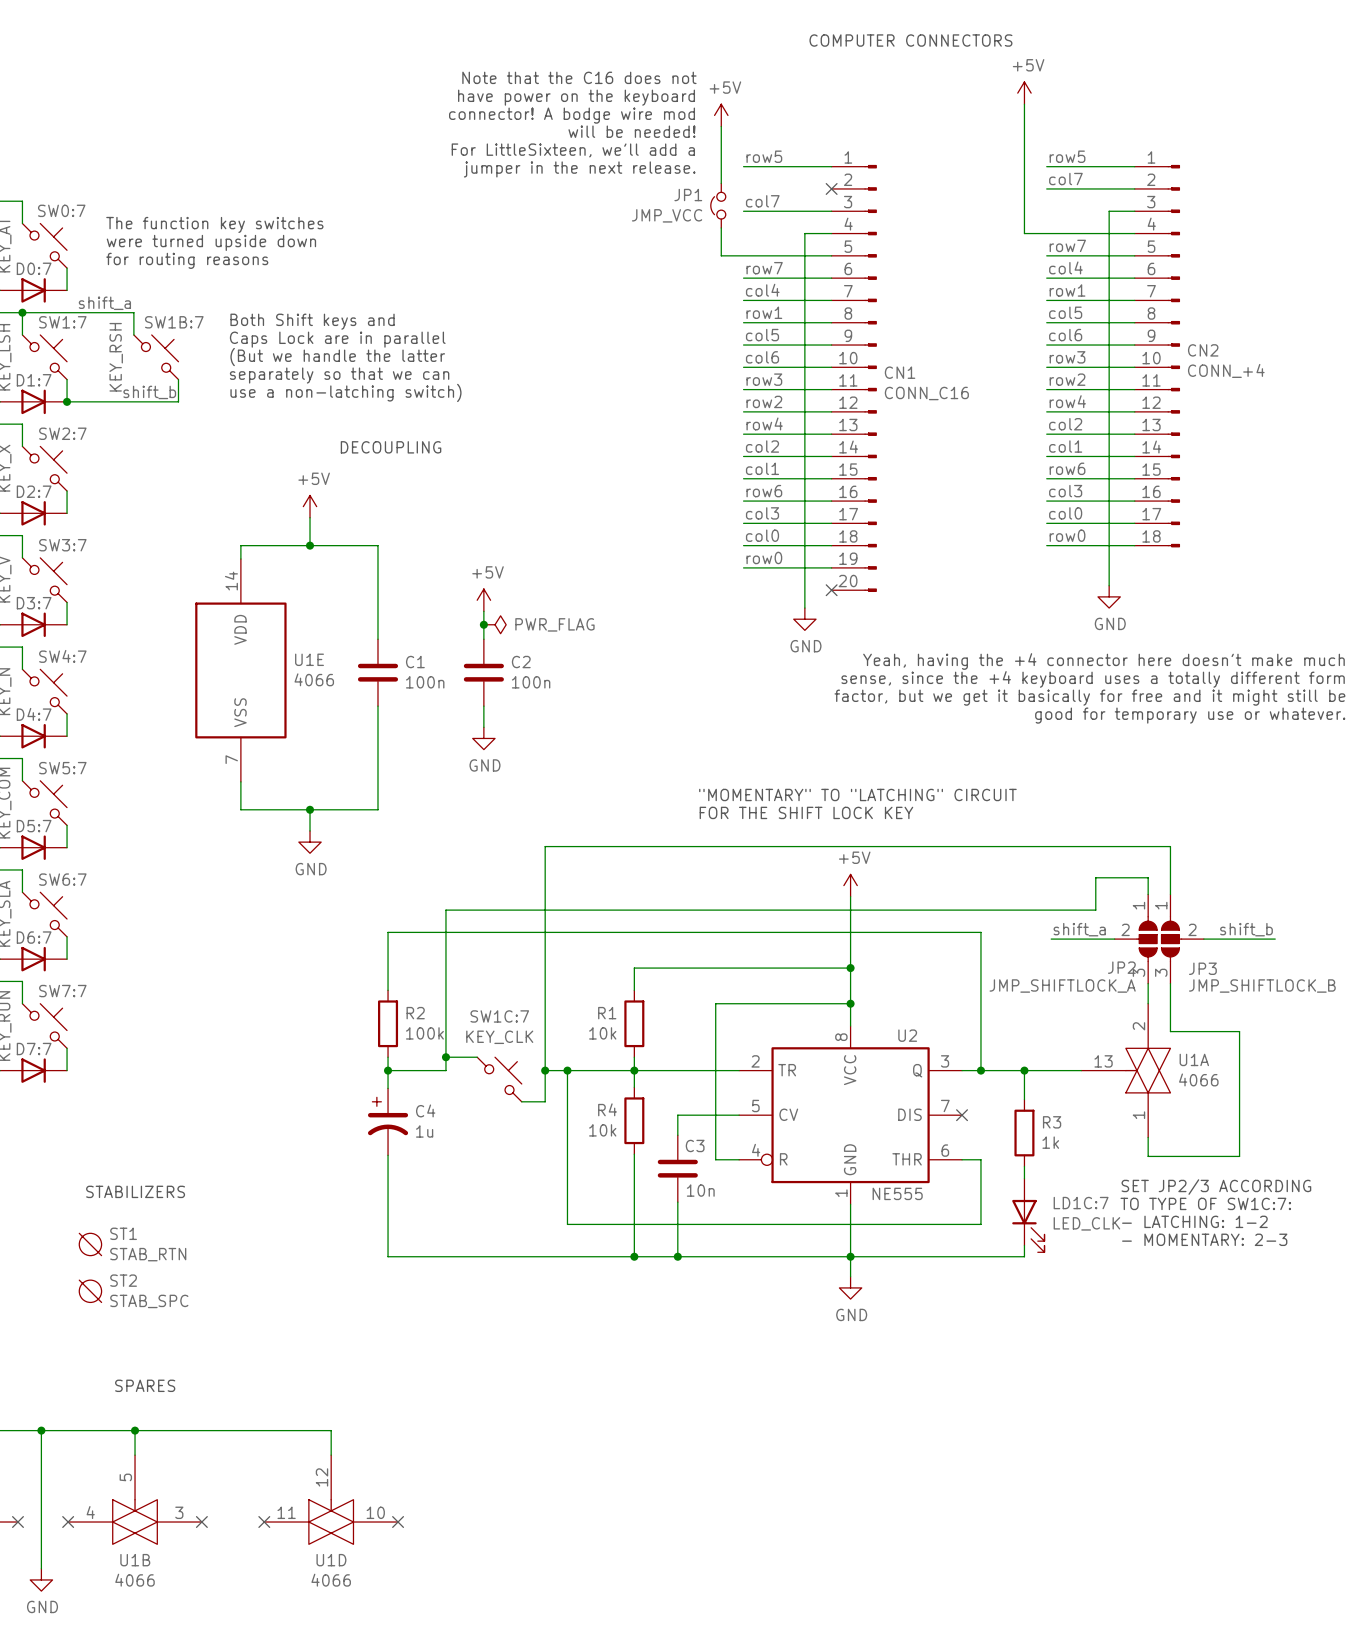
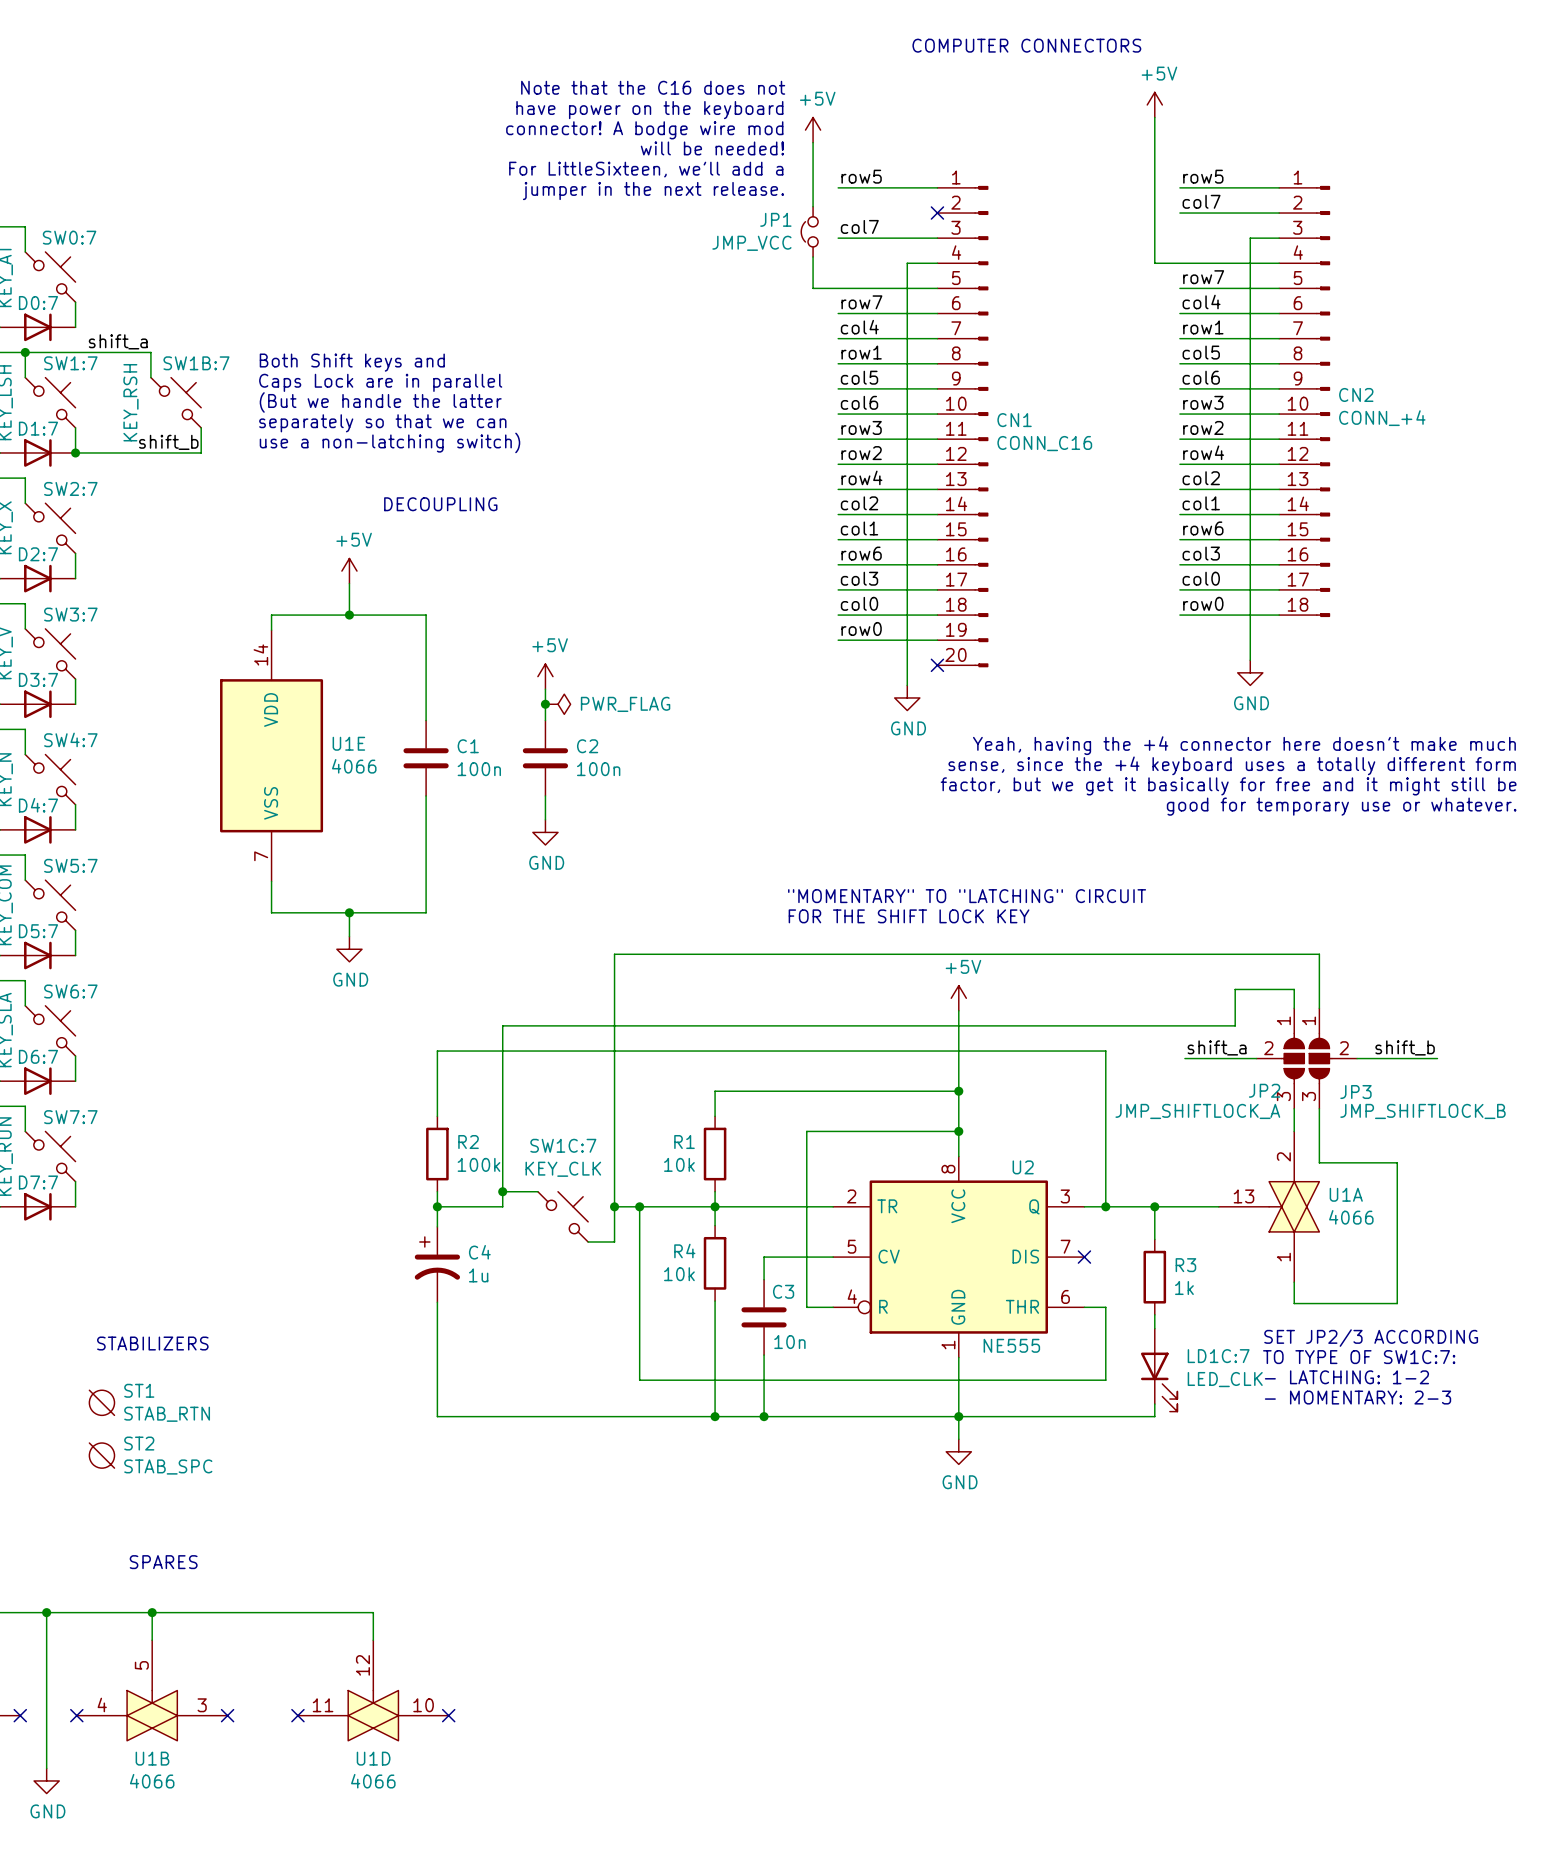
text: The function key switches (214, 224) -> none
text: were turned upside down (211, 242) -> none
text: for routing reasons (187, 260) -> none

